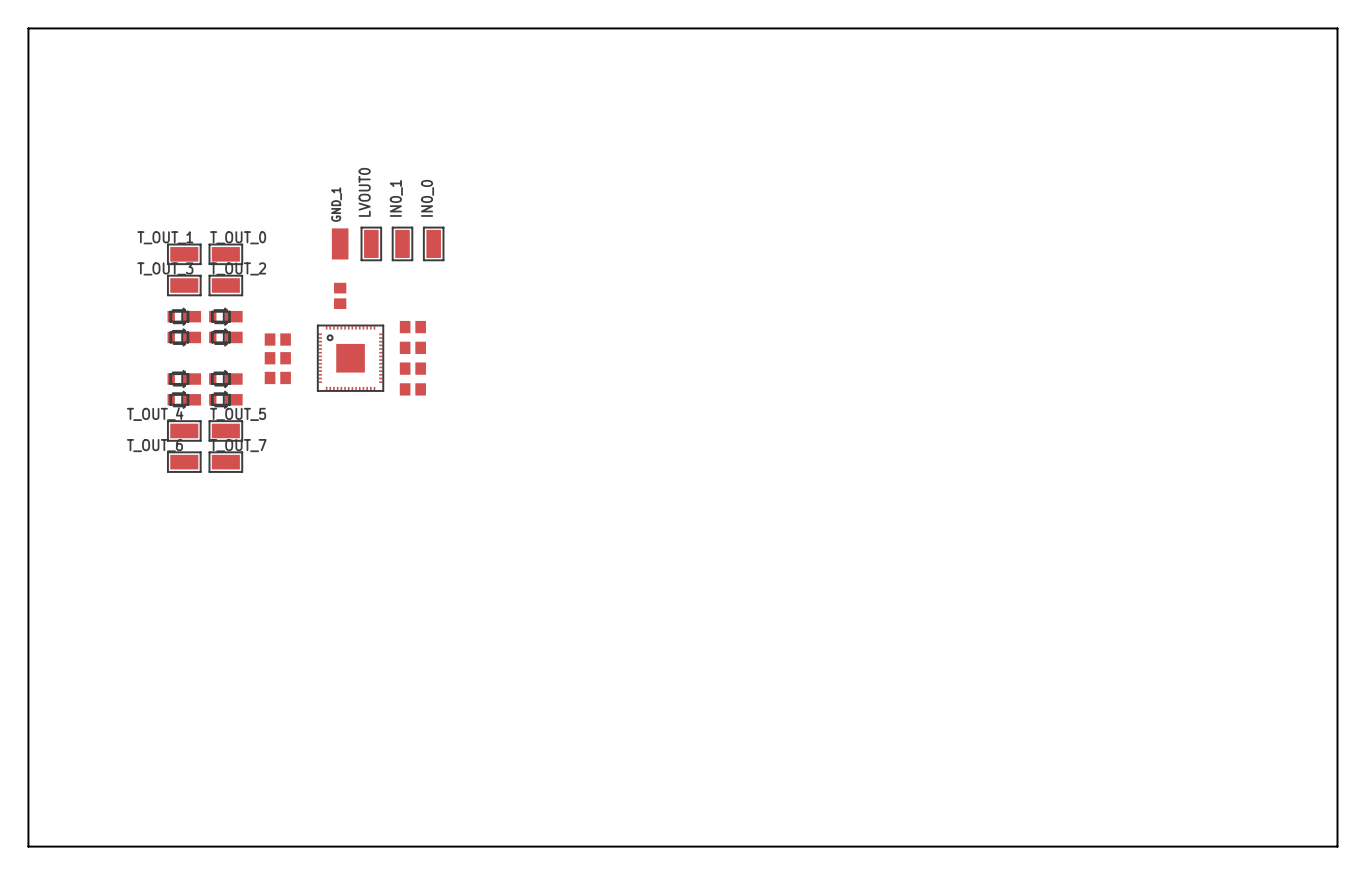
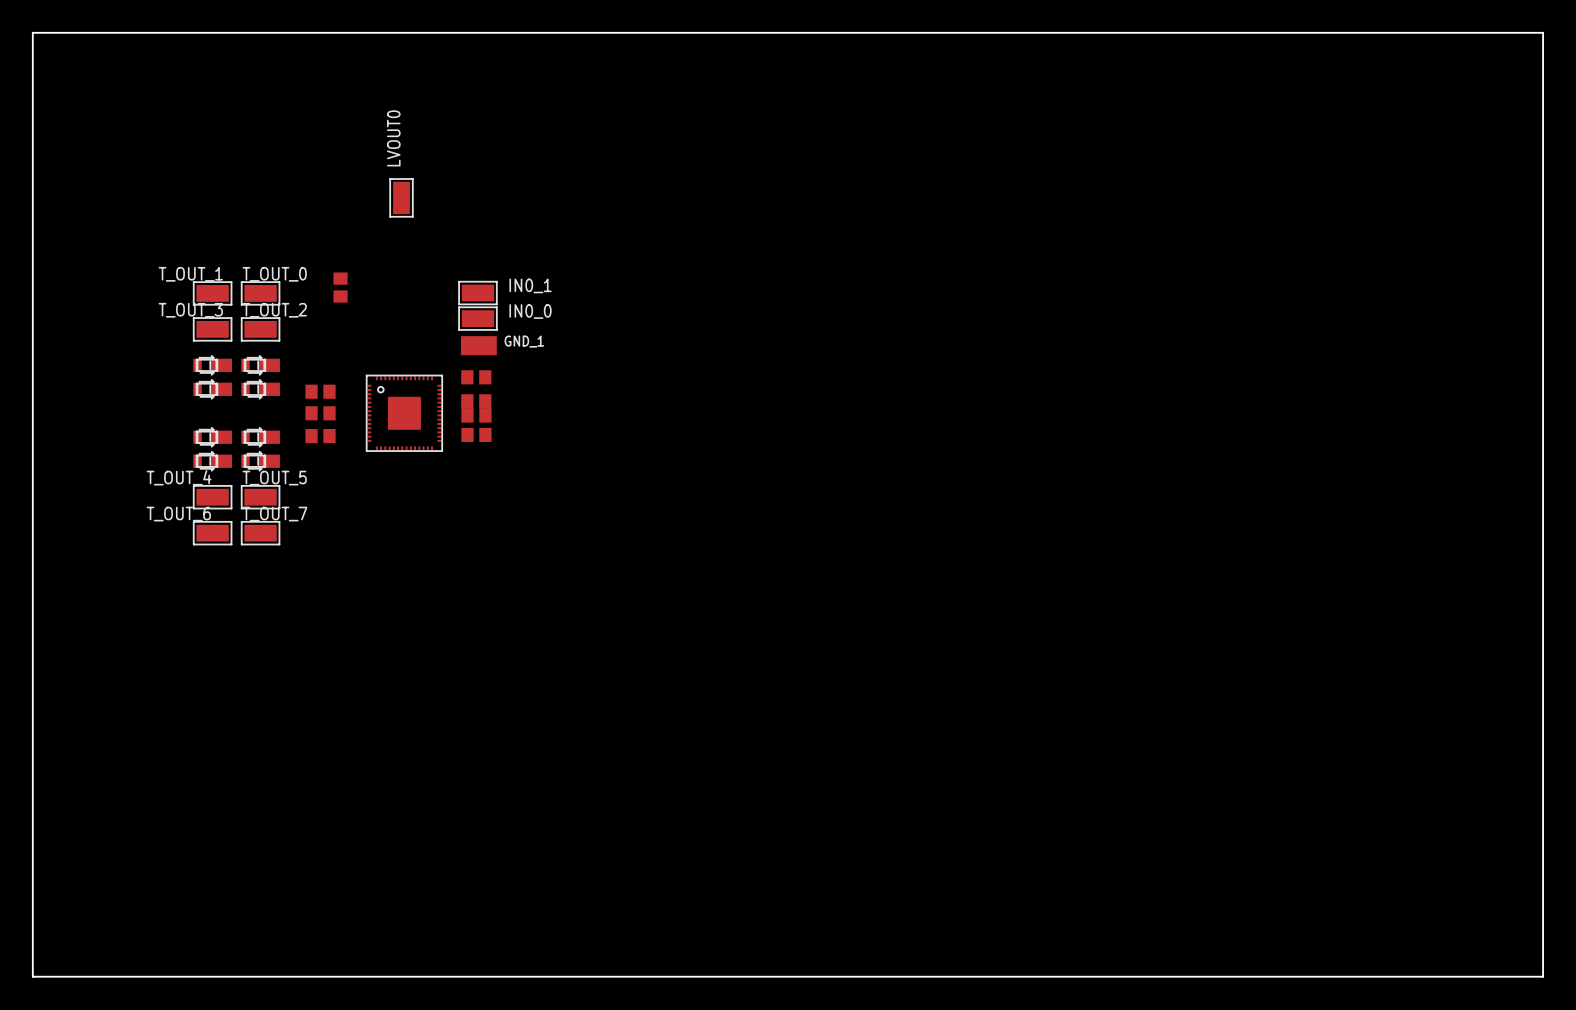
GND_1 rotation: 0° (340, 243) -> 90° clockwise (478, 345)
GND_1 position: (340, 243) -> (478, 345)
LVOUT0 position: (371, 243) -> (401, 197)
IN0_1 rotation: 0° (402, 243) -> 90° clockwise (477, 293)
IN0_0 rotation: 0° (433, 243) -> 90° clockwise (477, 318)
IN0_0 position: (433, 243) -> (477, 318)
part: none -> (340, 287)
part: (340, 295) -> none
part: none -> (476, 415)
part: (412, 368) -> none
part: none -> (476, 434)
part: (412, 389) -> none

